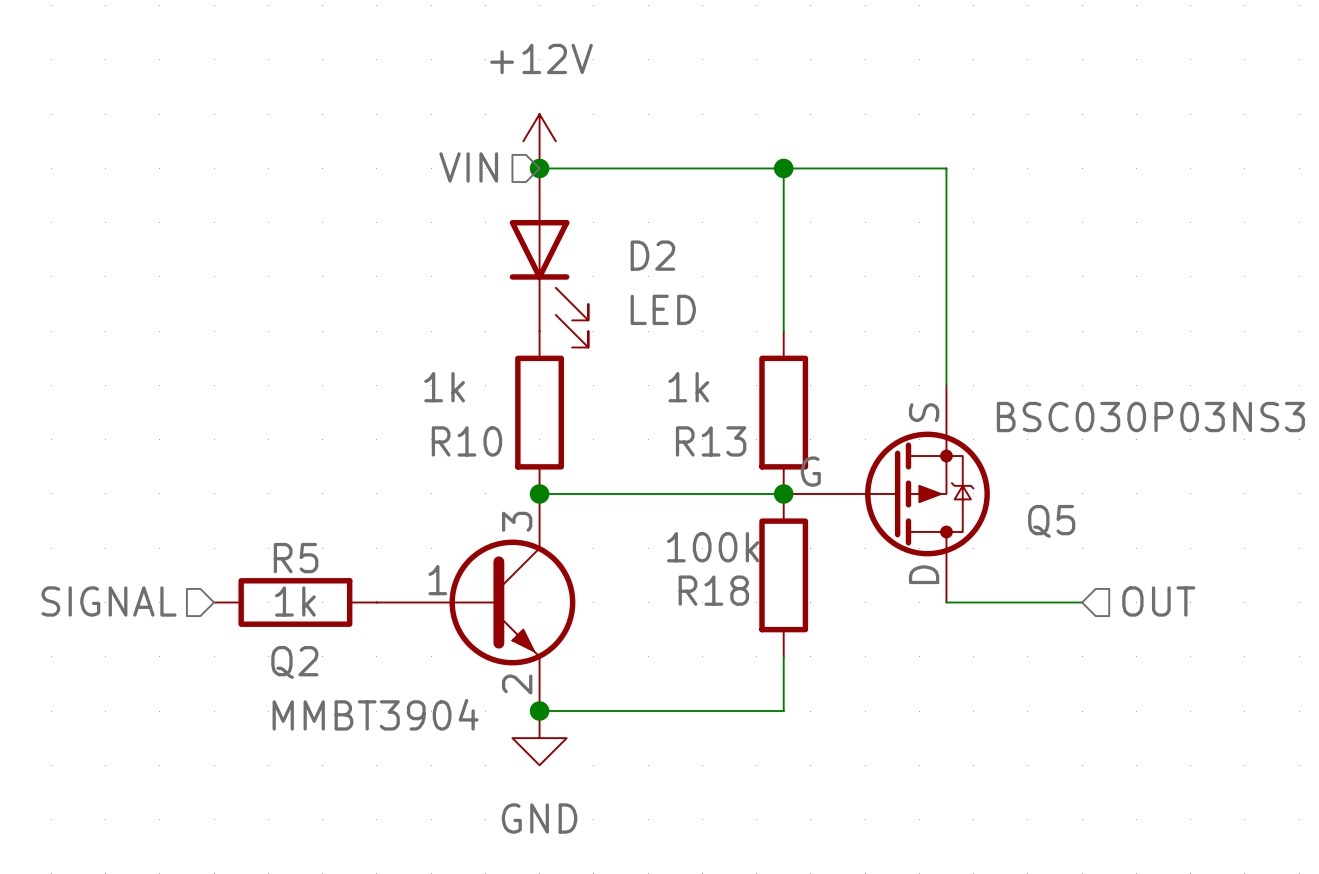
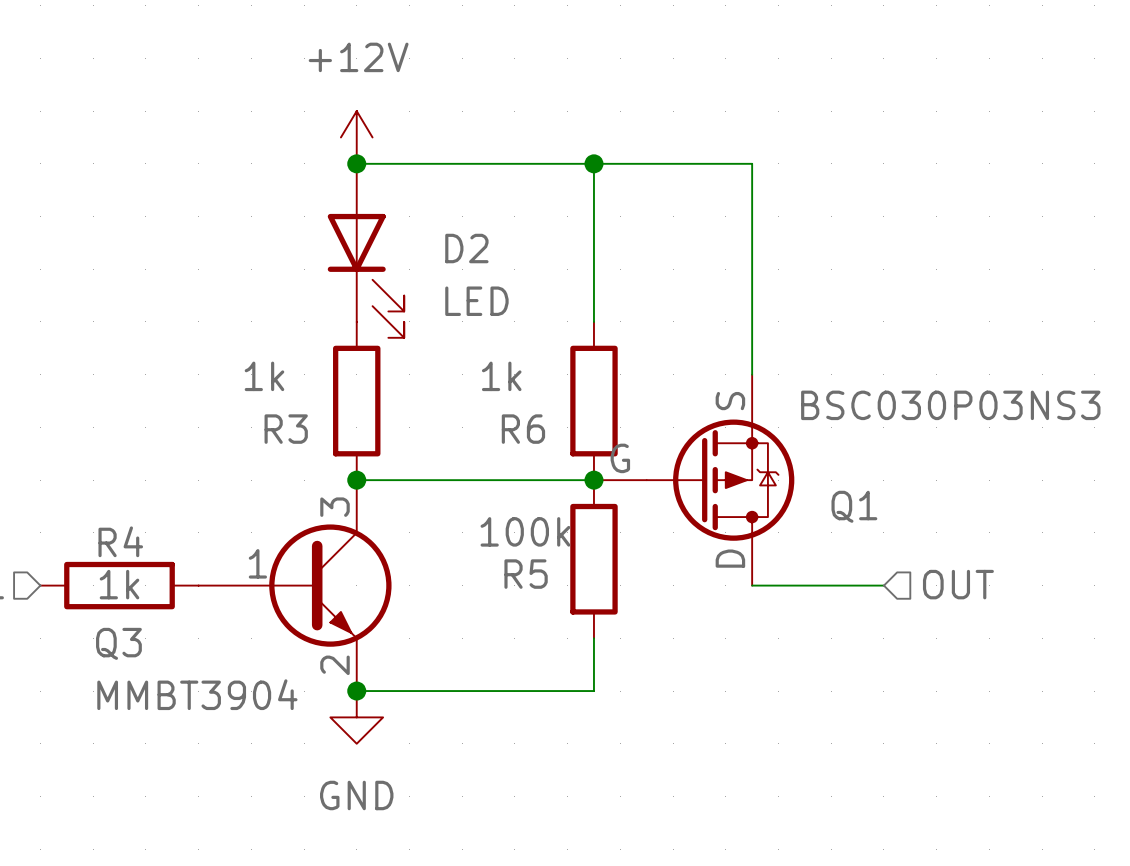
hierarchical label: VIN (468, 167) -> none
R10 name: R10 (466, 441) -> R3 (286, 429)
R13 name: R13 (711, 441) -> R6 (523, 429)
Q5 name: Q5 (1051, 521) -> Q1 (854, 506)
R5 name: R5 (296, 558) -> R4 (120, 541)
R18 name: R18 (713, 590) -> R5 (526, 574)
Q2 name: Q2 (294, 662) -> Q3 (118, 643)

